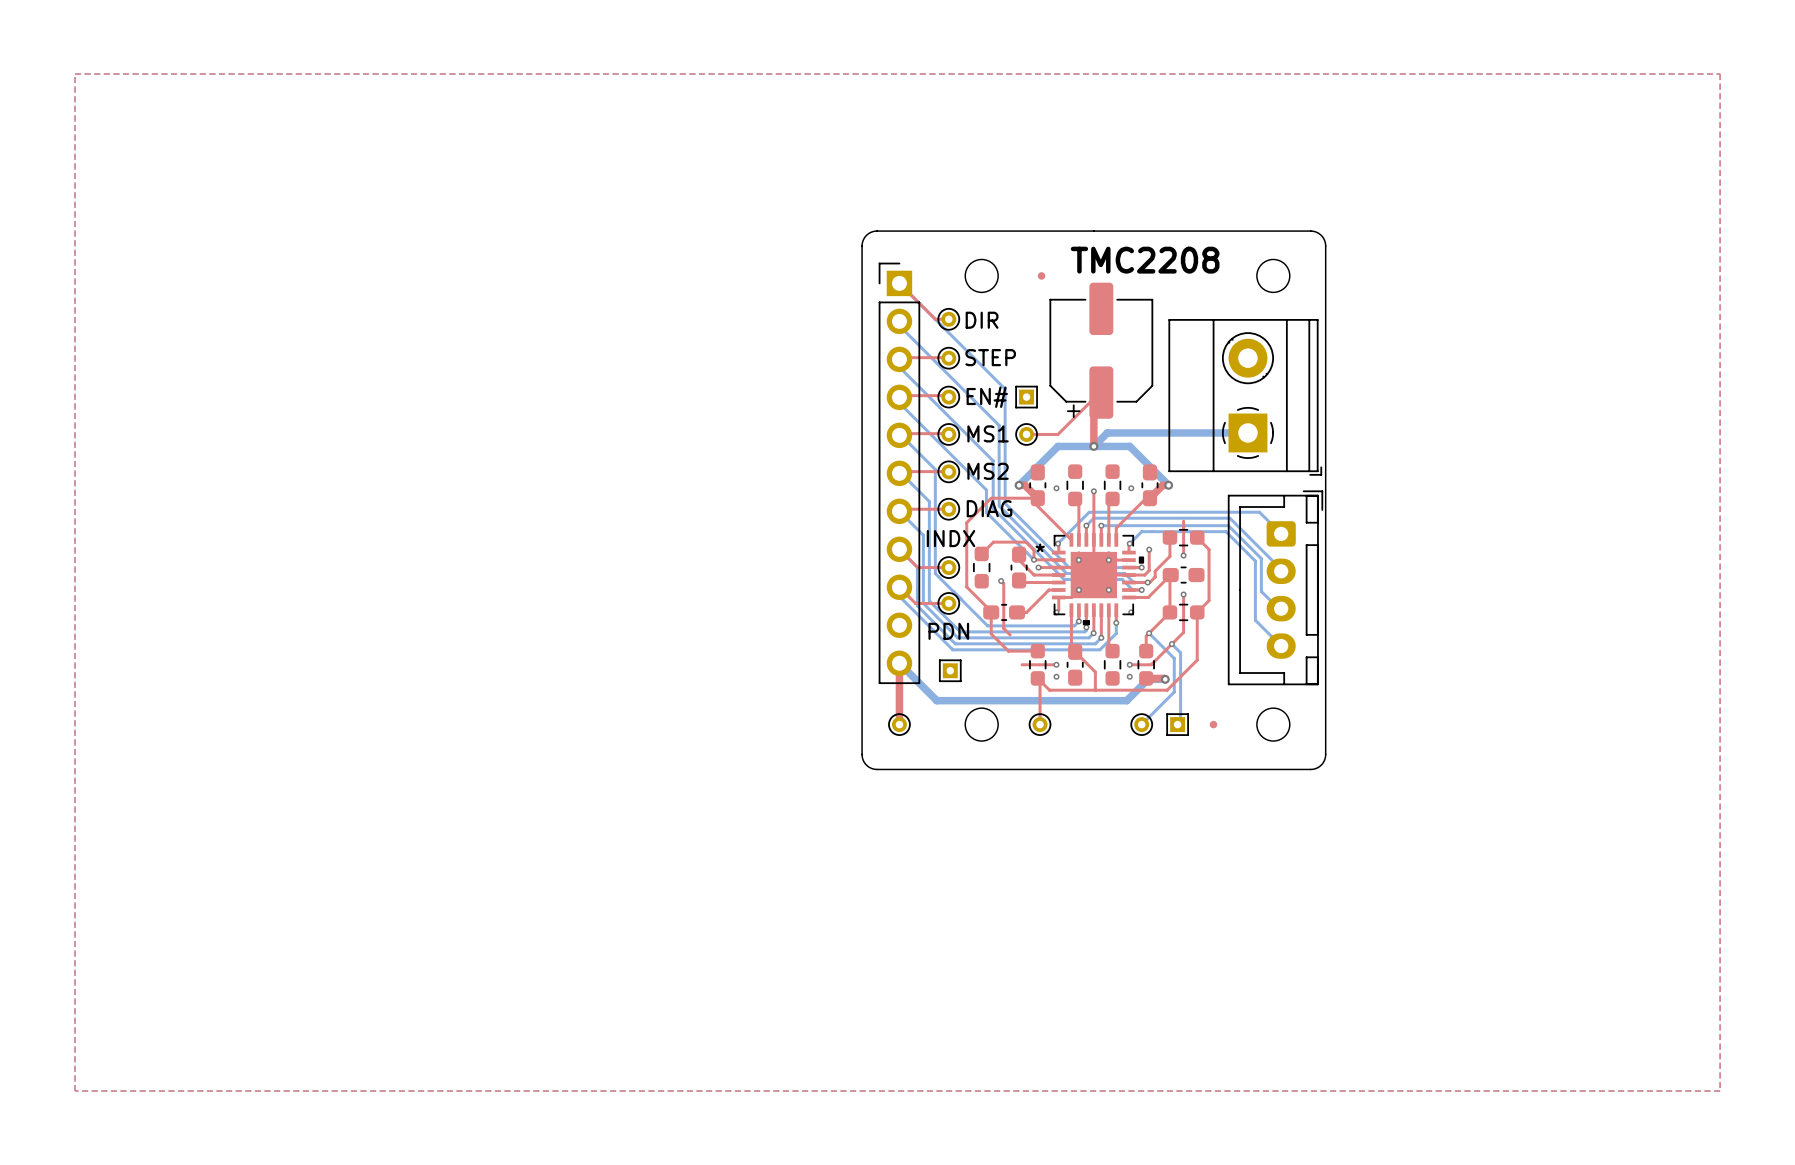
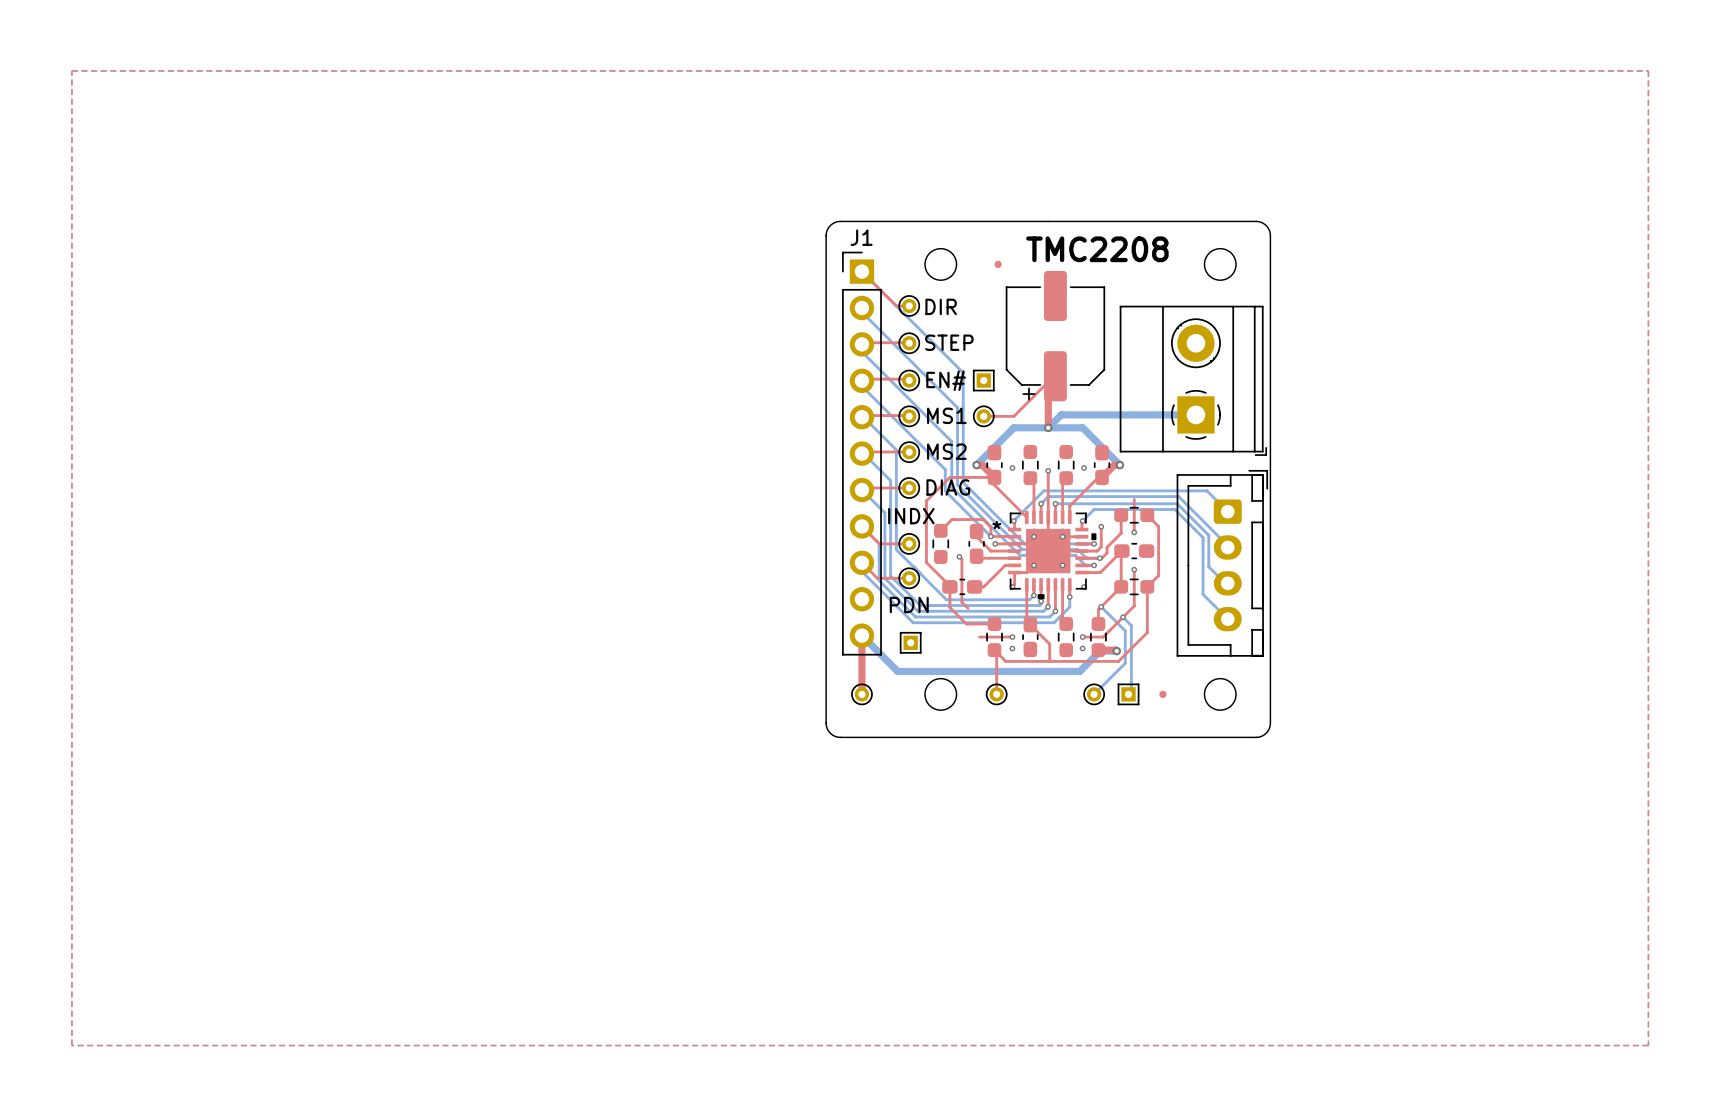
J1 name: none -> J1 (861, 237)

